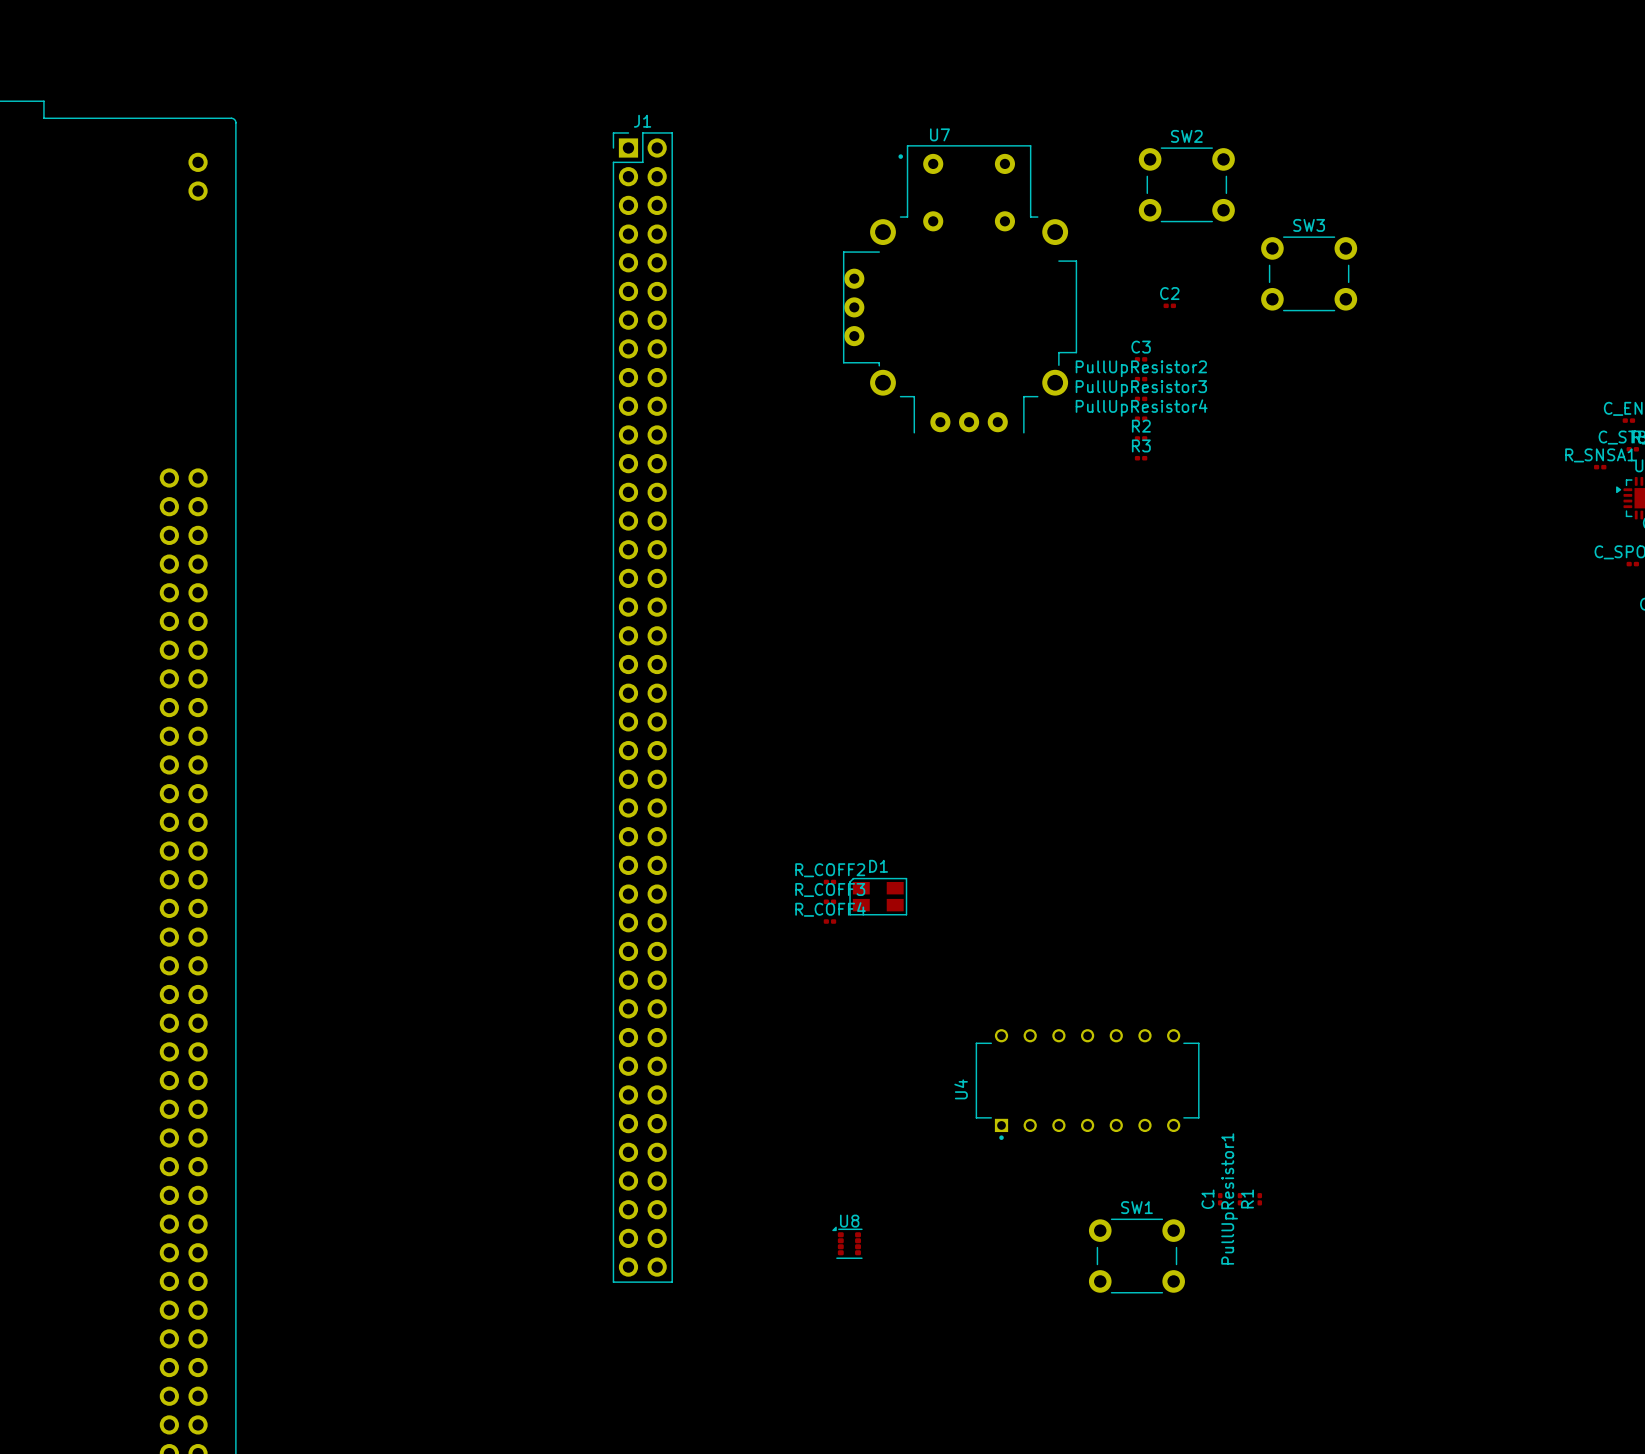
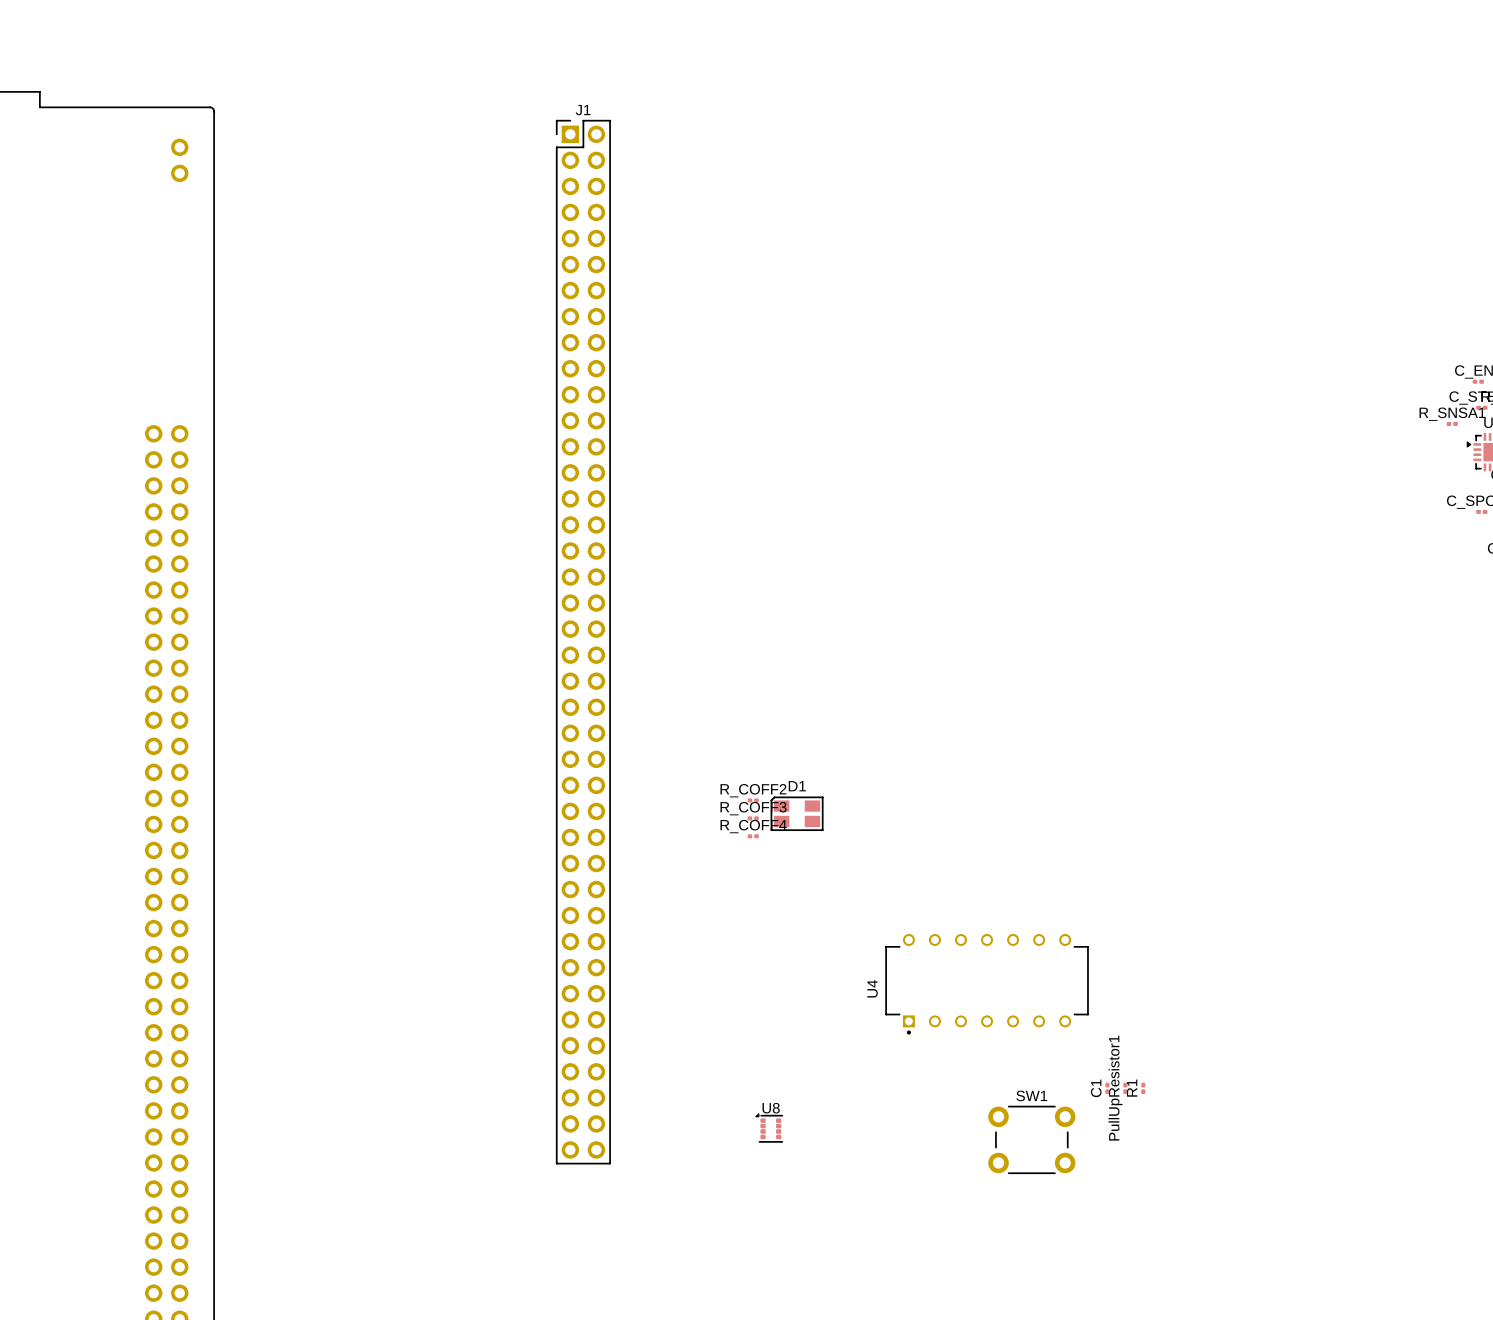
SW2: (1186, 184) -> none
SW3: (1309, 273) -> none
U7: (960, 289) -> none
C2: (1169, 305) -> none
C3: (1141, 359) -> none
PullUpResistor2: (1141, 379) -> none
PullUpResistor3: (1141, 398) -> none
PullUpResistor4: (1141, 418) -> none
R2: (1141, 438) -> none
R3: (1141, 458) -> none

